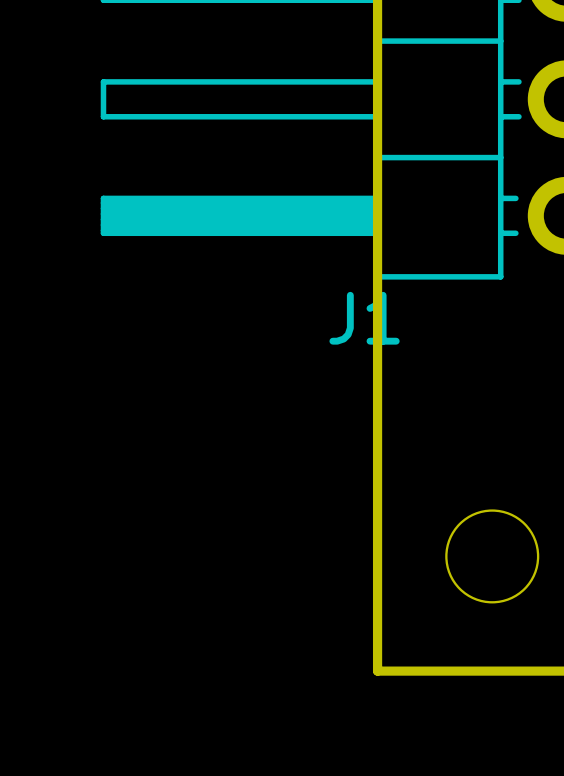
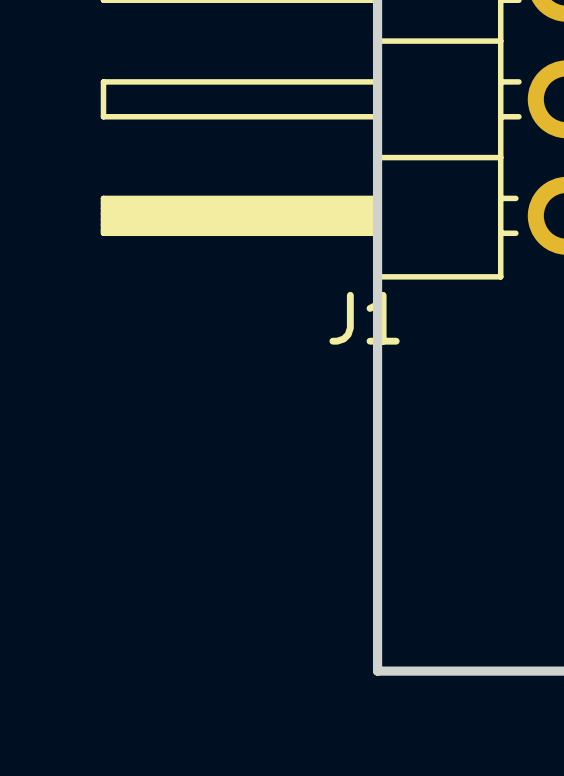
round board edge: [445, 509, 540, 604] -> none

